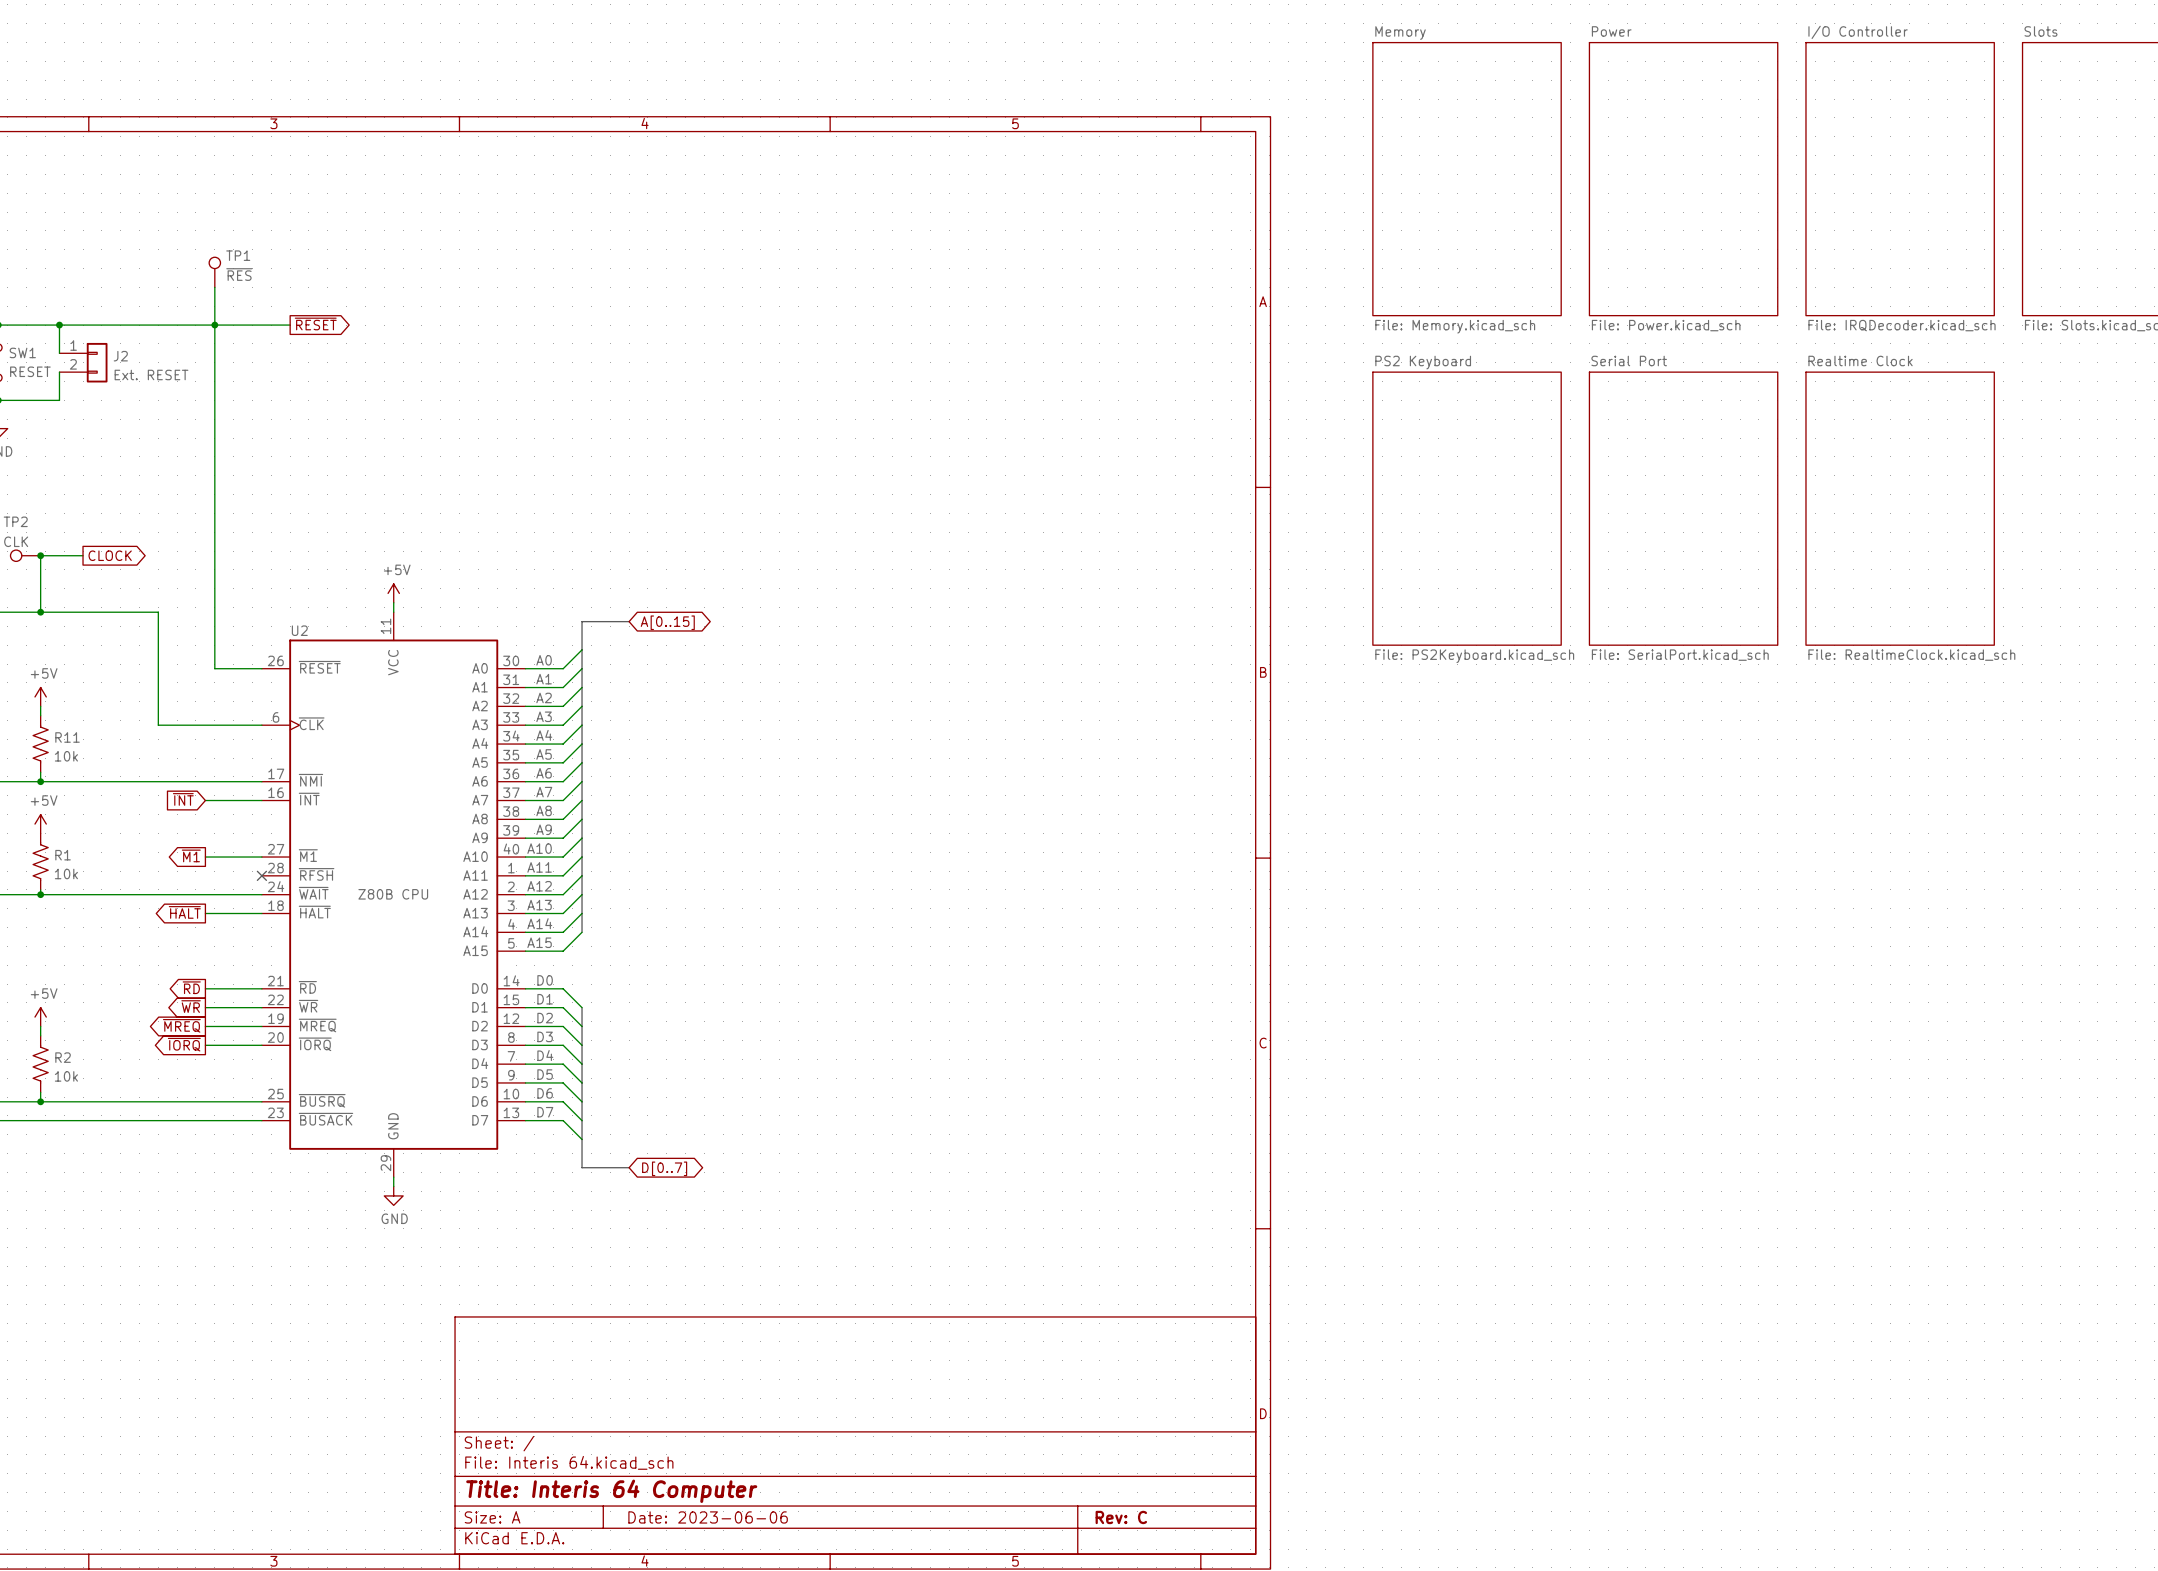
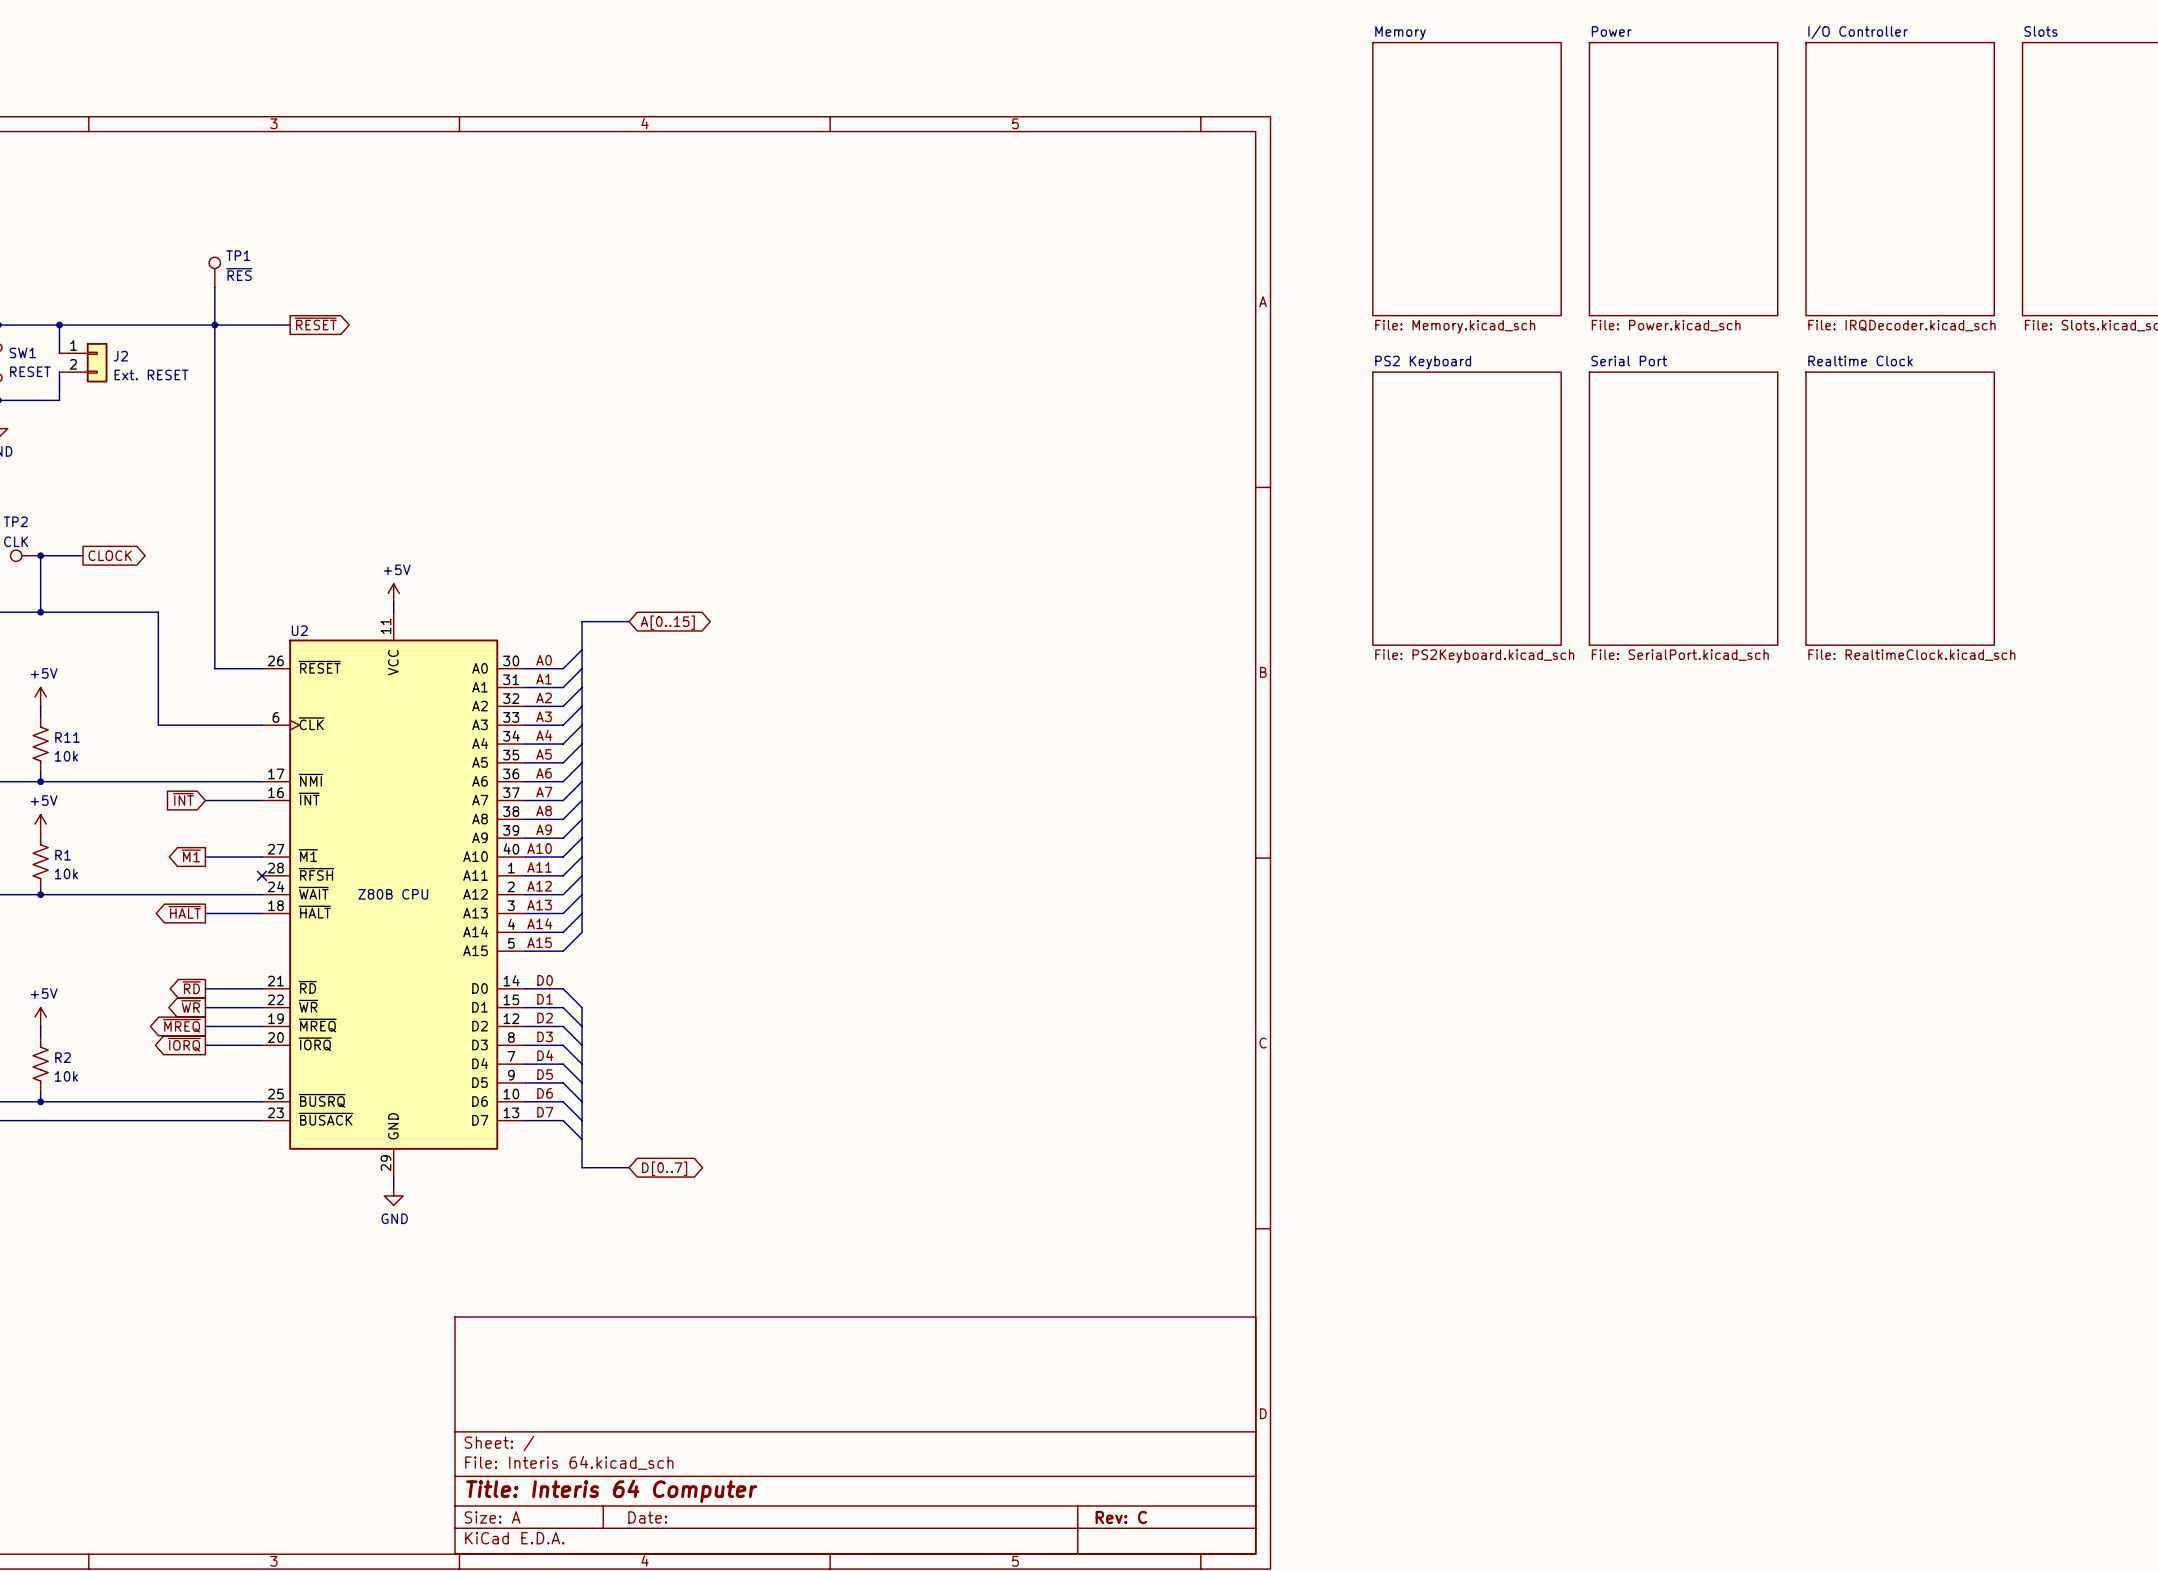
title block: Date: 2023-06-06 (708, 1517) -> Date: (647, 1517)

